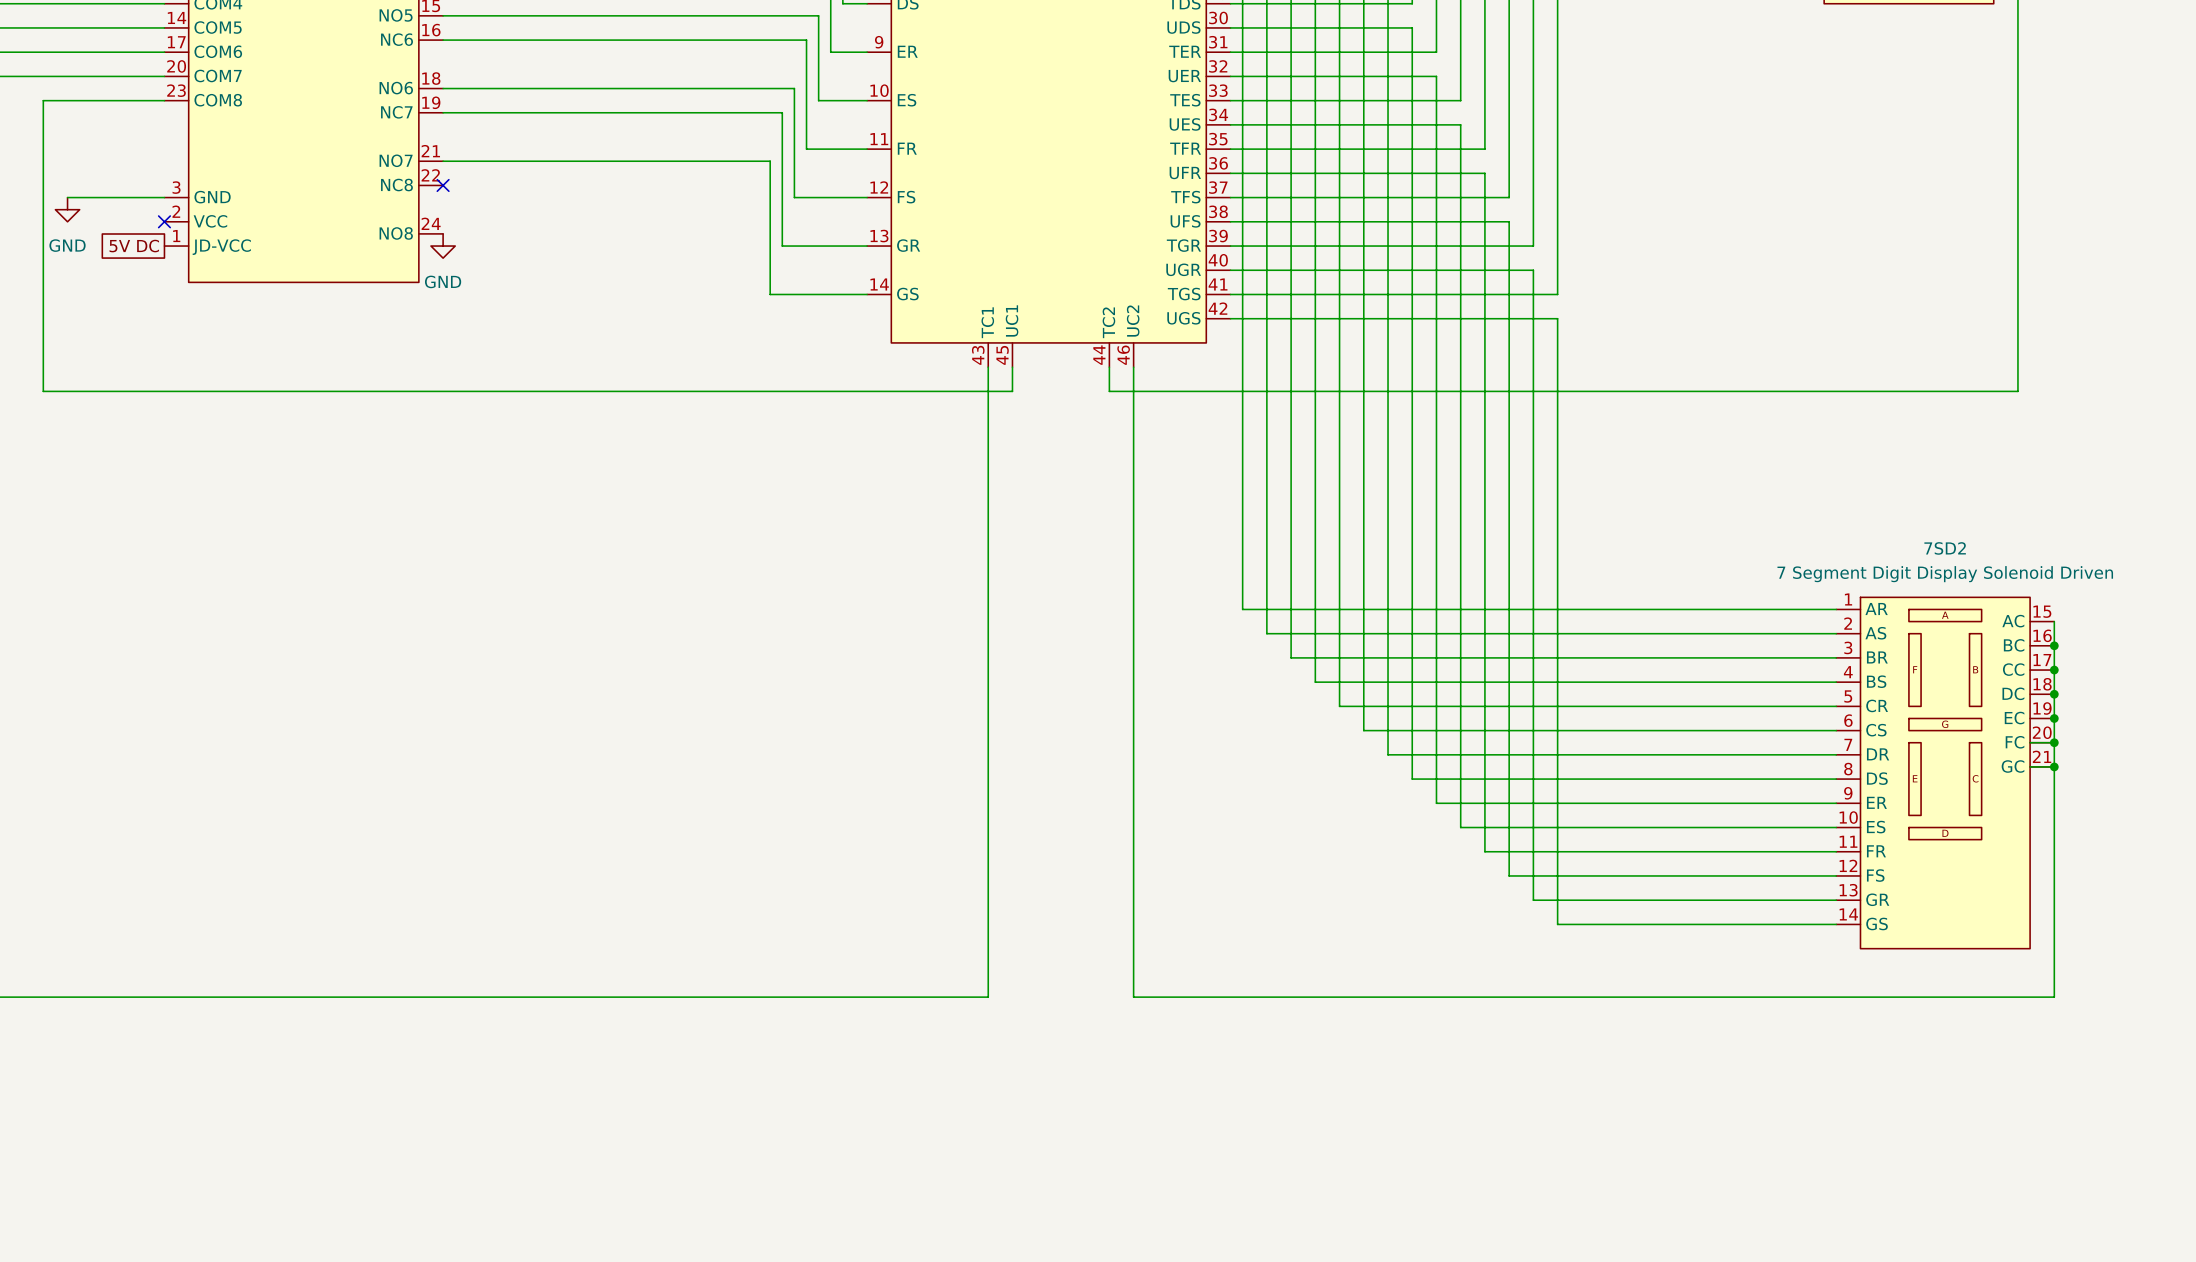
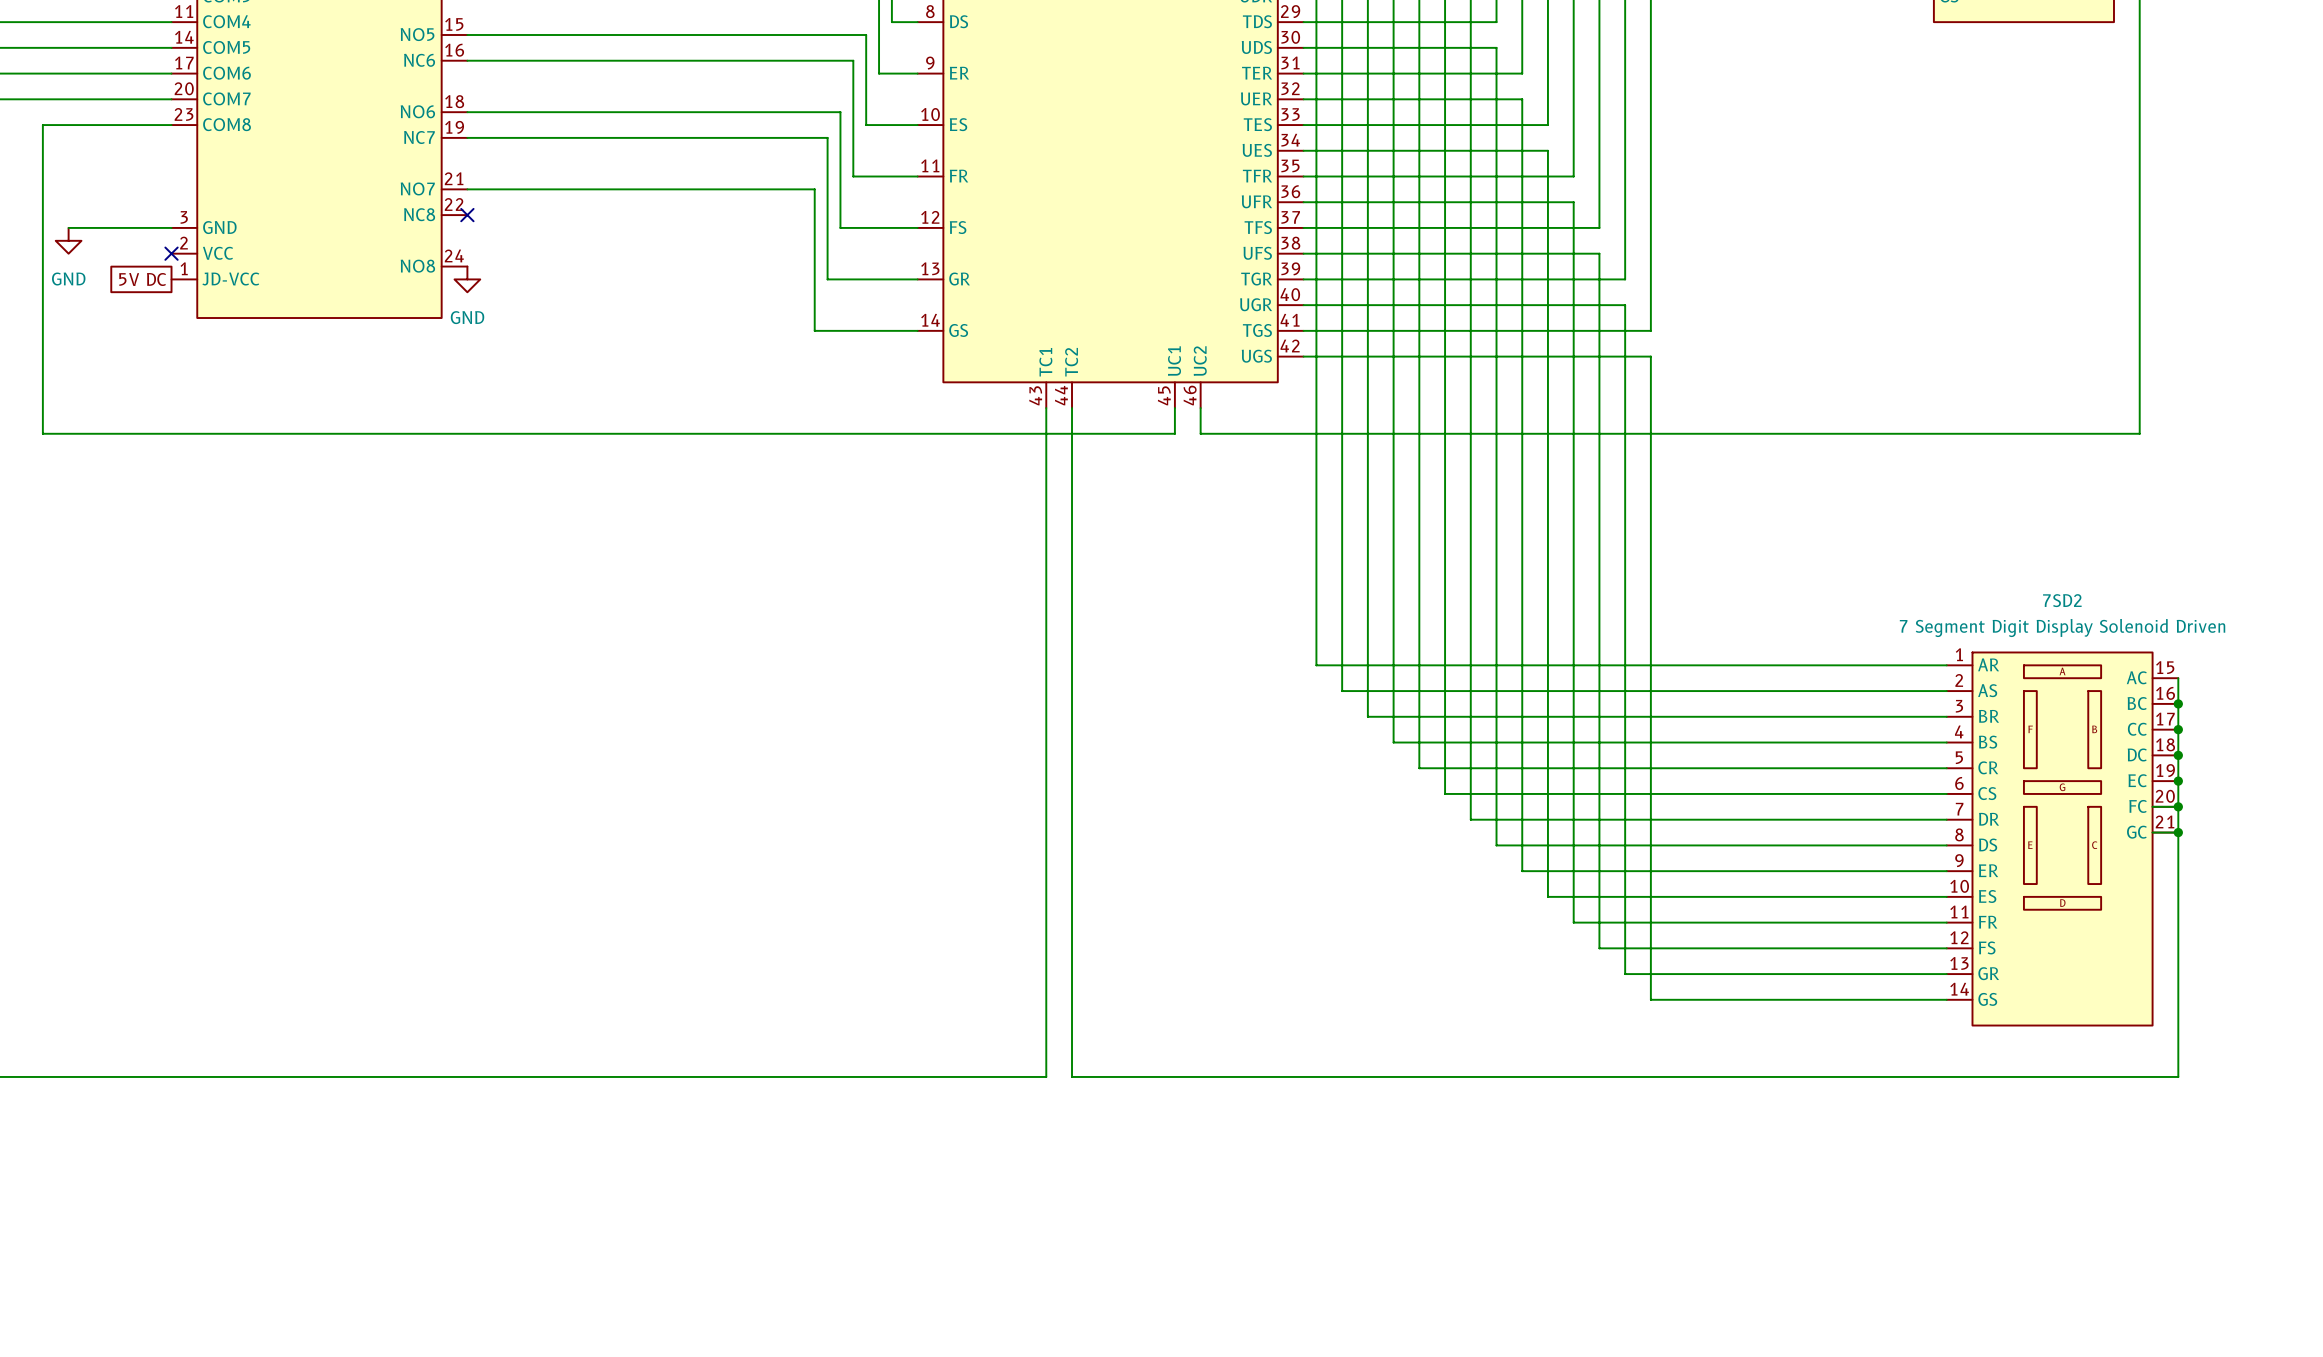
part pin name: UC1 (1012, 320) -> TC2 (1071, 362)
part pin name: TC2 (1108, 322) -> UC1 (1174, 361)
part pin number: 45 (1002, 355) -> 44 (1061, 395)
part pin number: 44 (1099, 355) -> 45 (1164, 395)
wire: (1109, 391) (1133, 391) (1133, 997) -> (1174, 433) (1072, 433) (1072, 1076) (1200, 1076)

